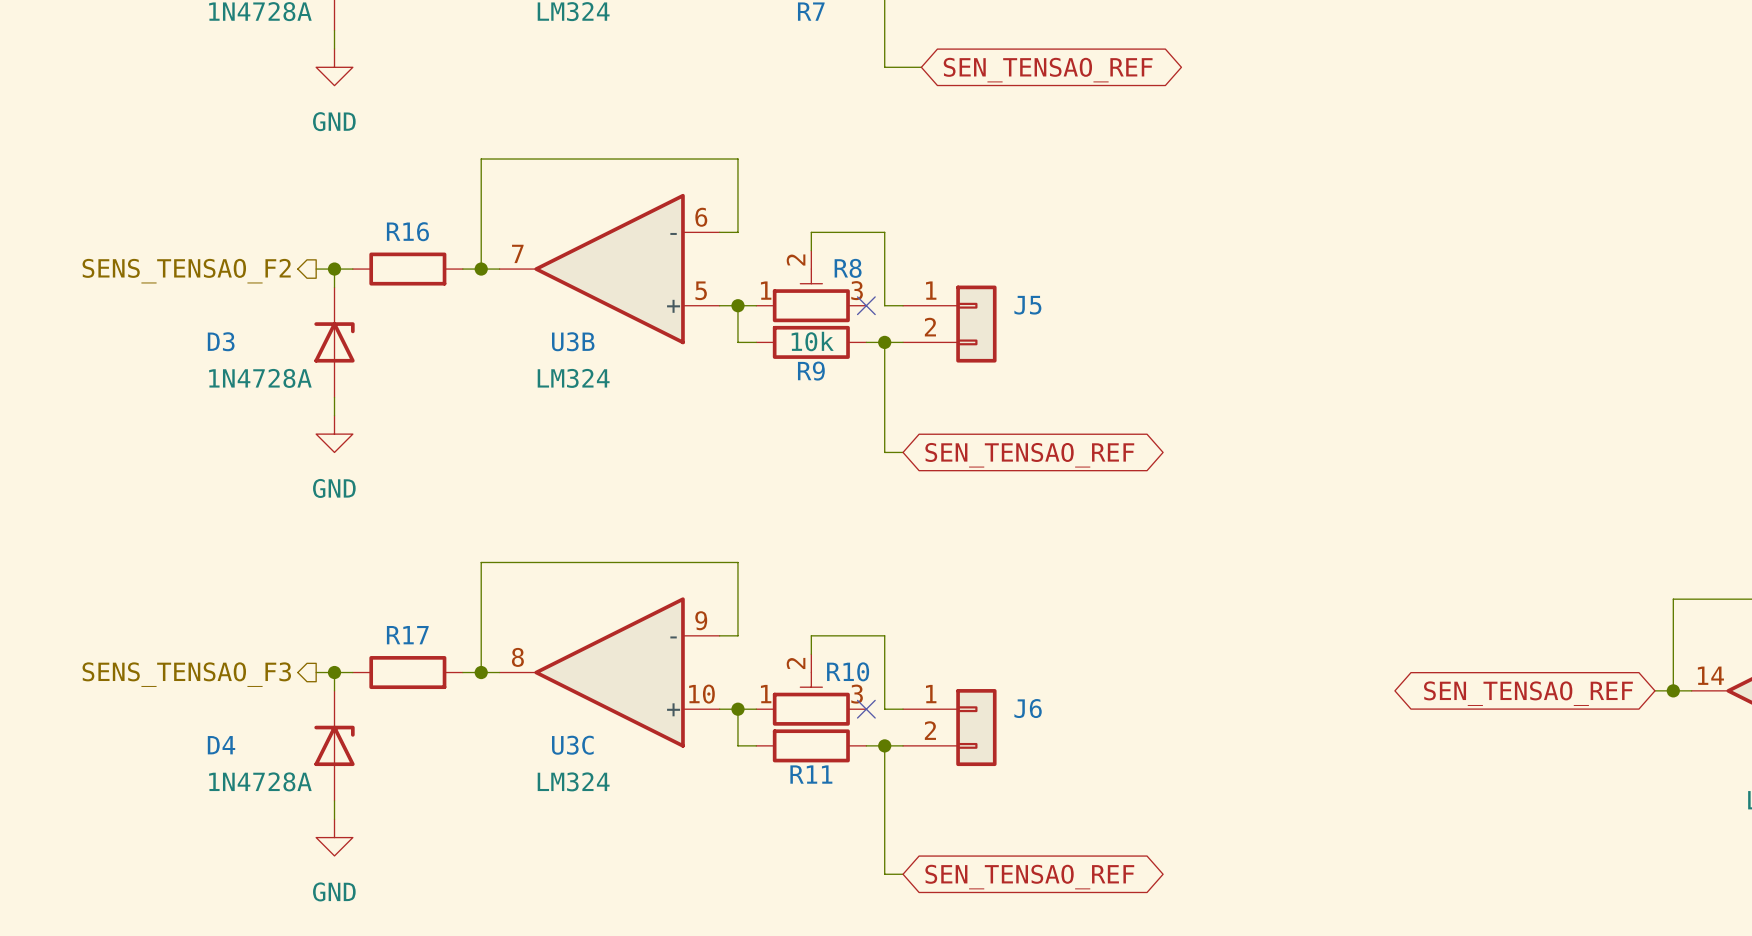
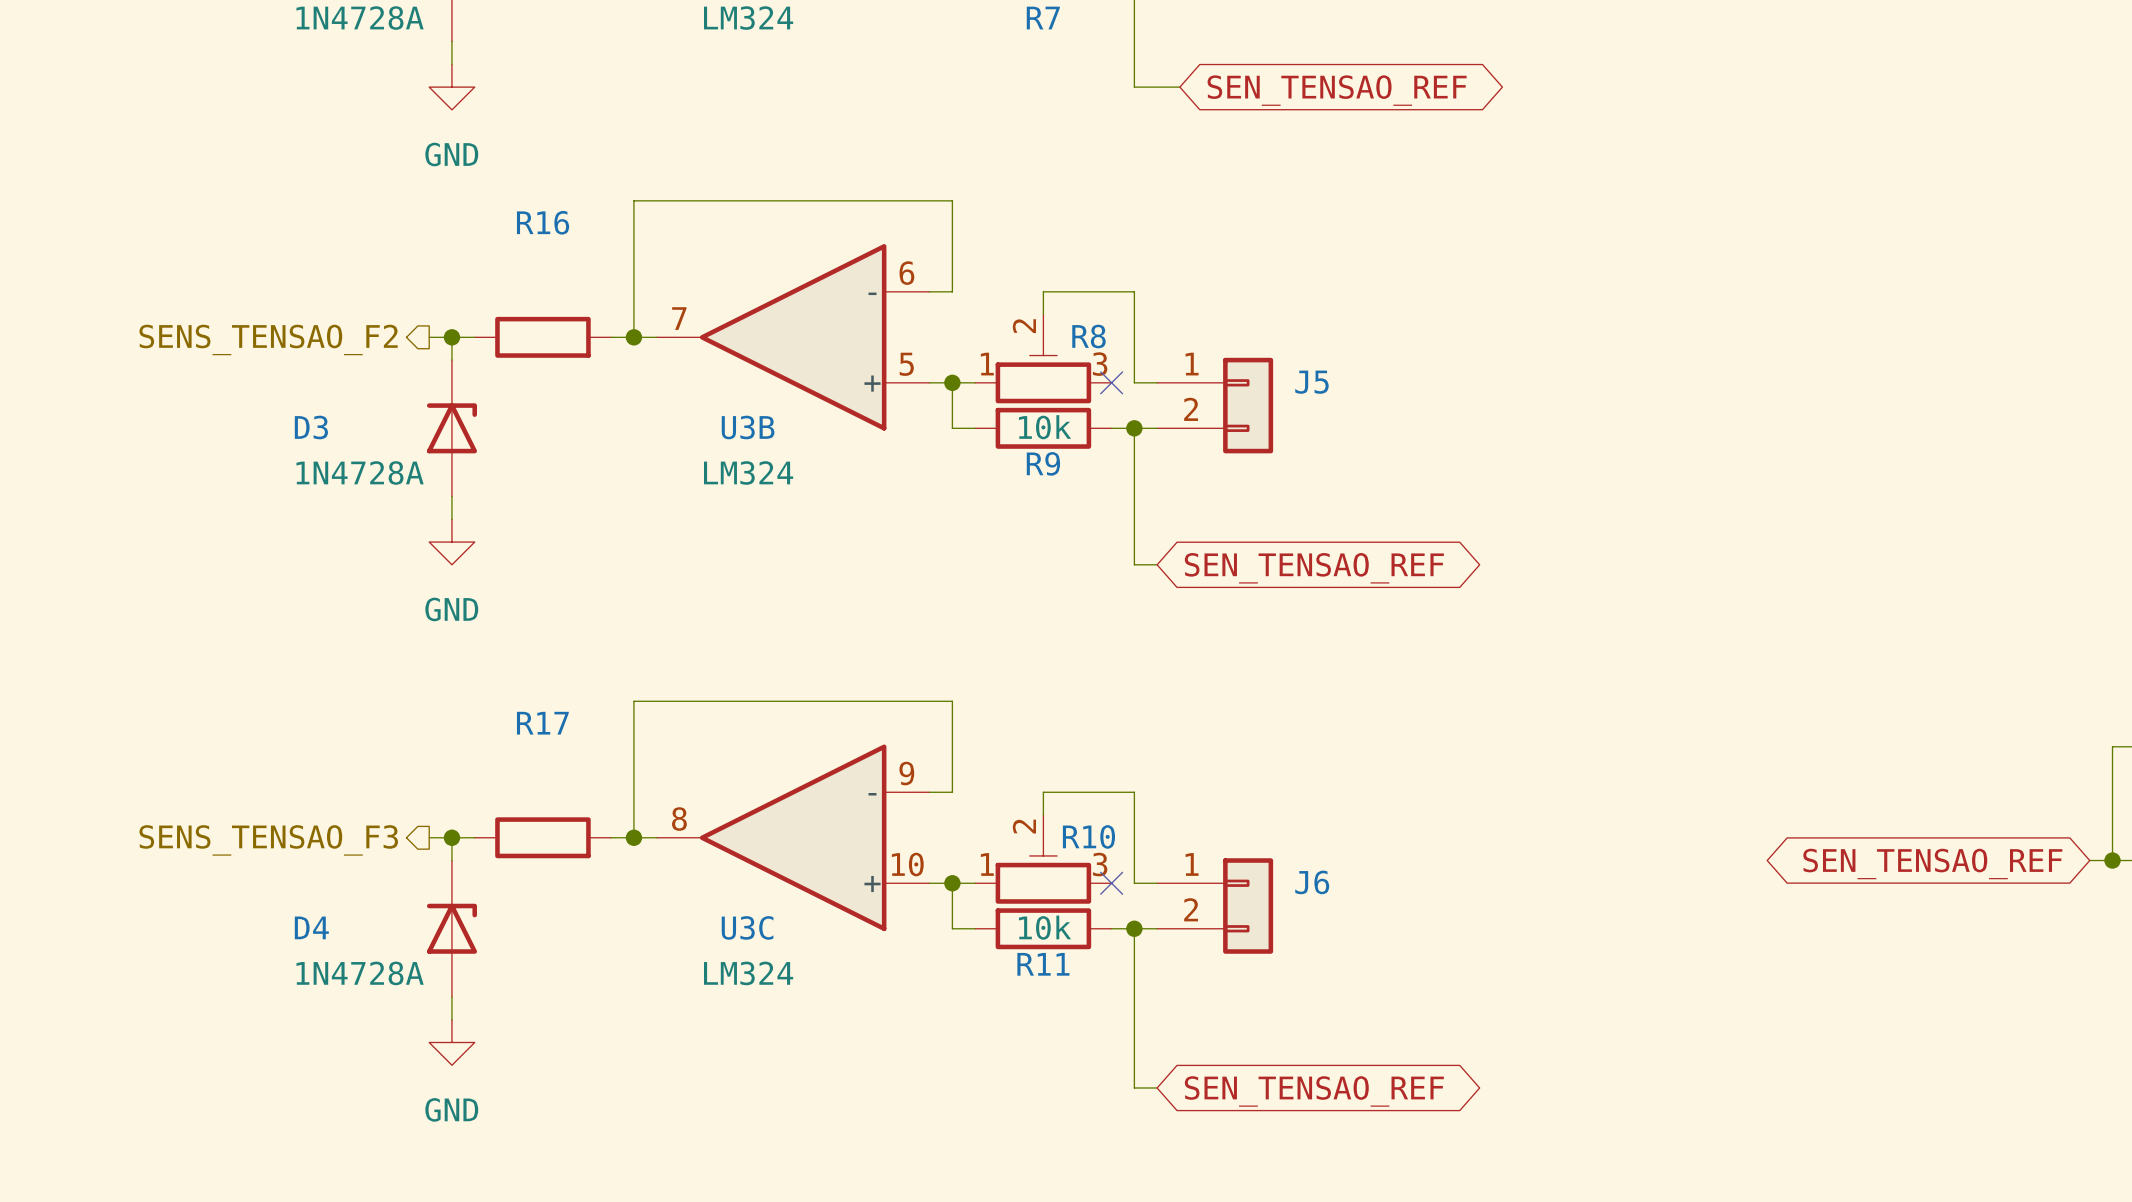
R16 name position: R16 (407, 231) -> R16 (543, 222)
R17 name position: R17 (407, 635) -> R17 (542, 723)
R11 value: none -> 10k (1045, 927)

